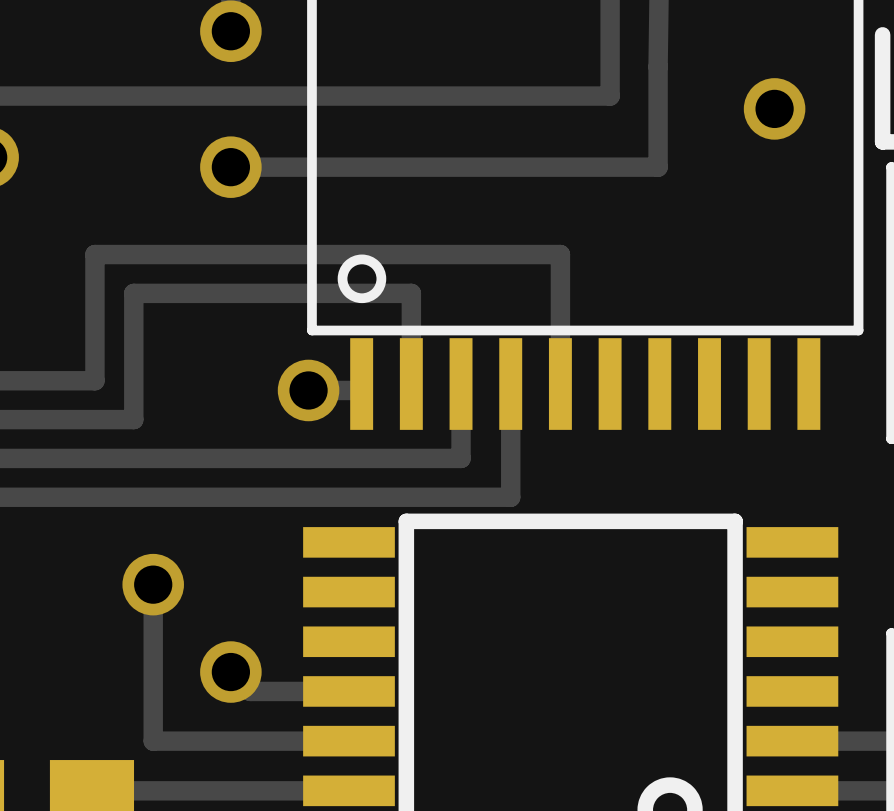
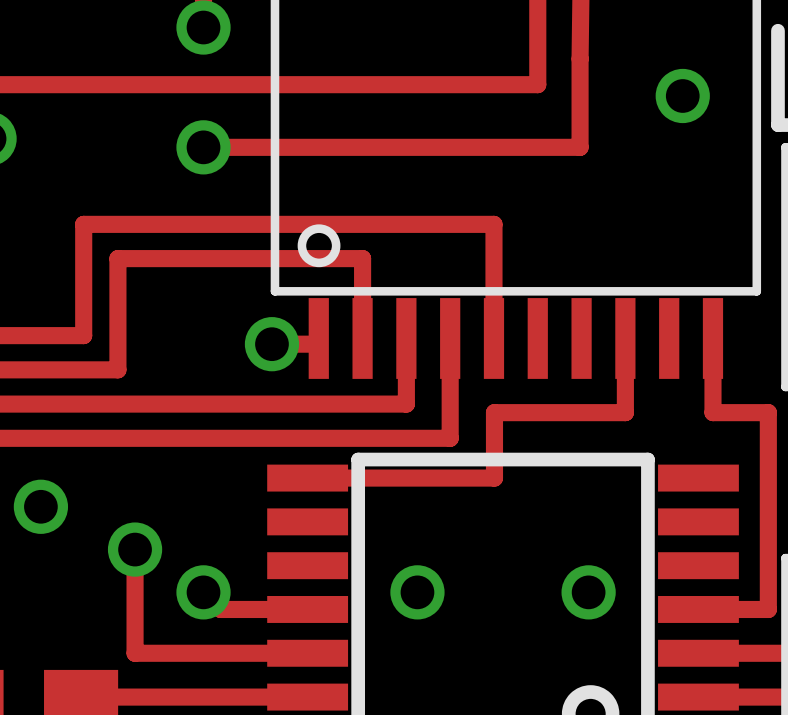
track: none -> (625, 338) (625, 412) (494, 412) (494, 478) (307, 478)
track: none -> (712, 338) (712, 412) (768, 412) (768, 609) (698, 609)
via: none -> (40, 506)
via position: (153, 584) -> (135, 549)
via: none -> (417, 592)
via: none -> (588, 592)

